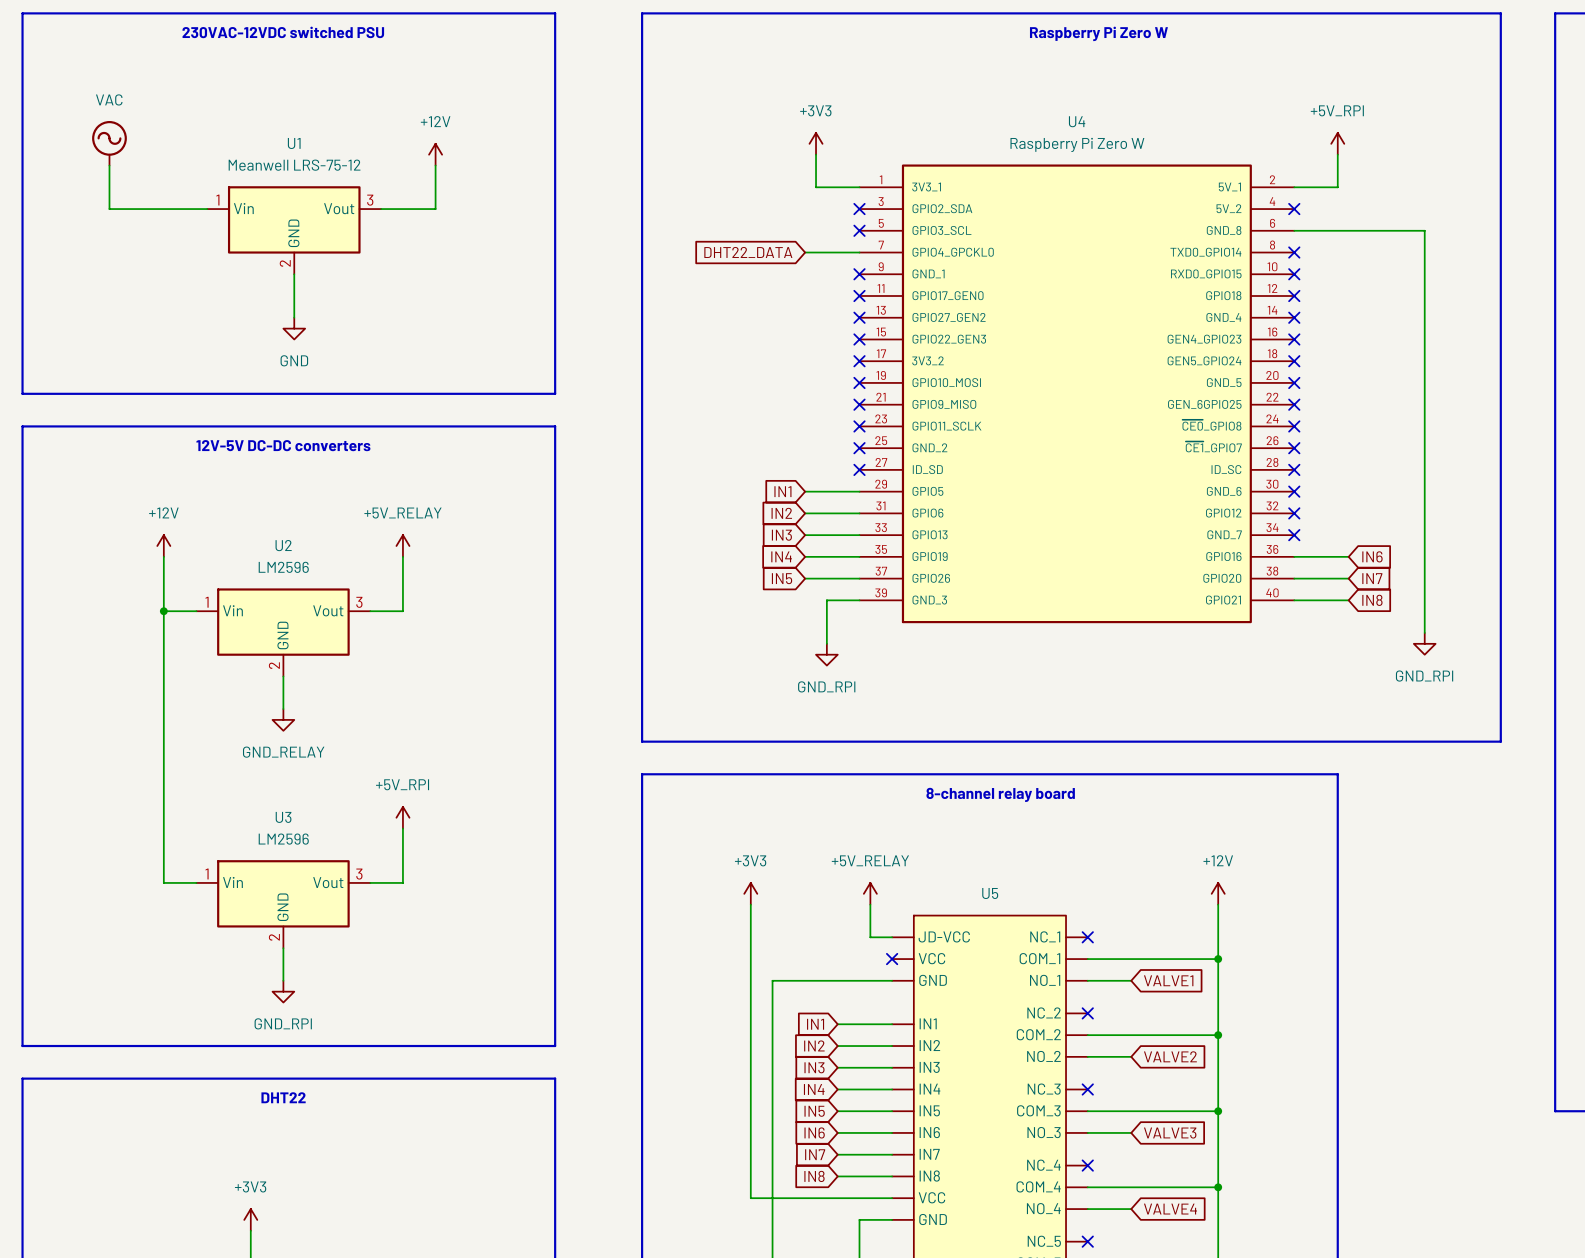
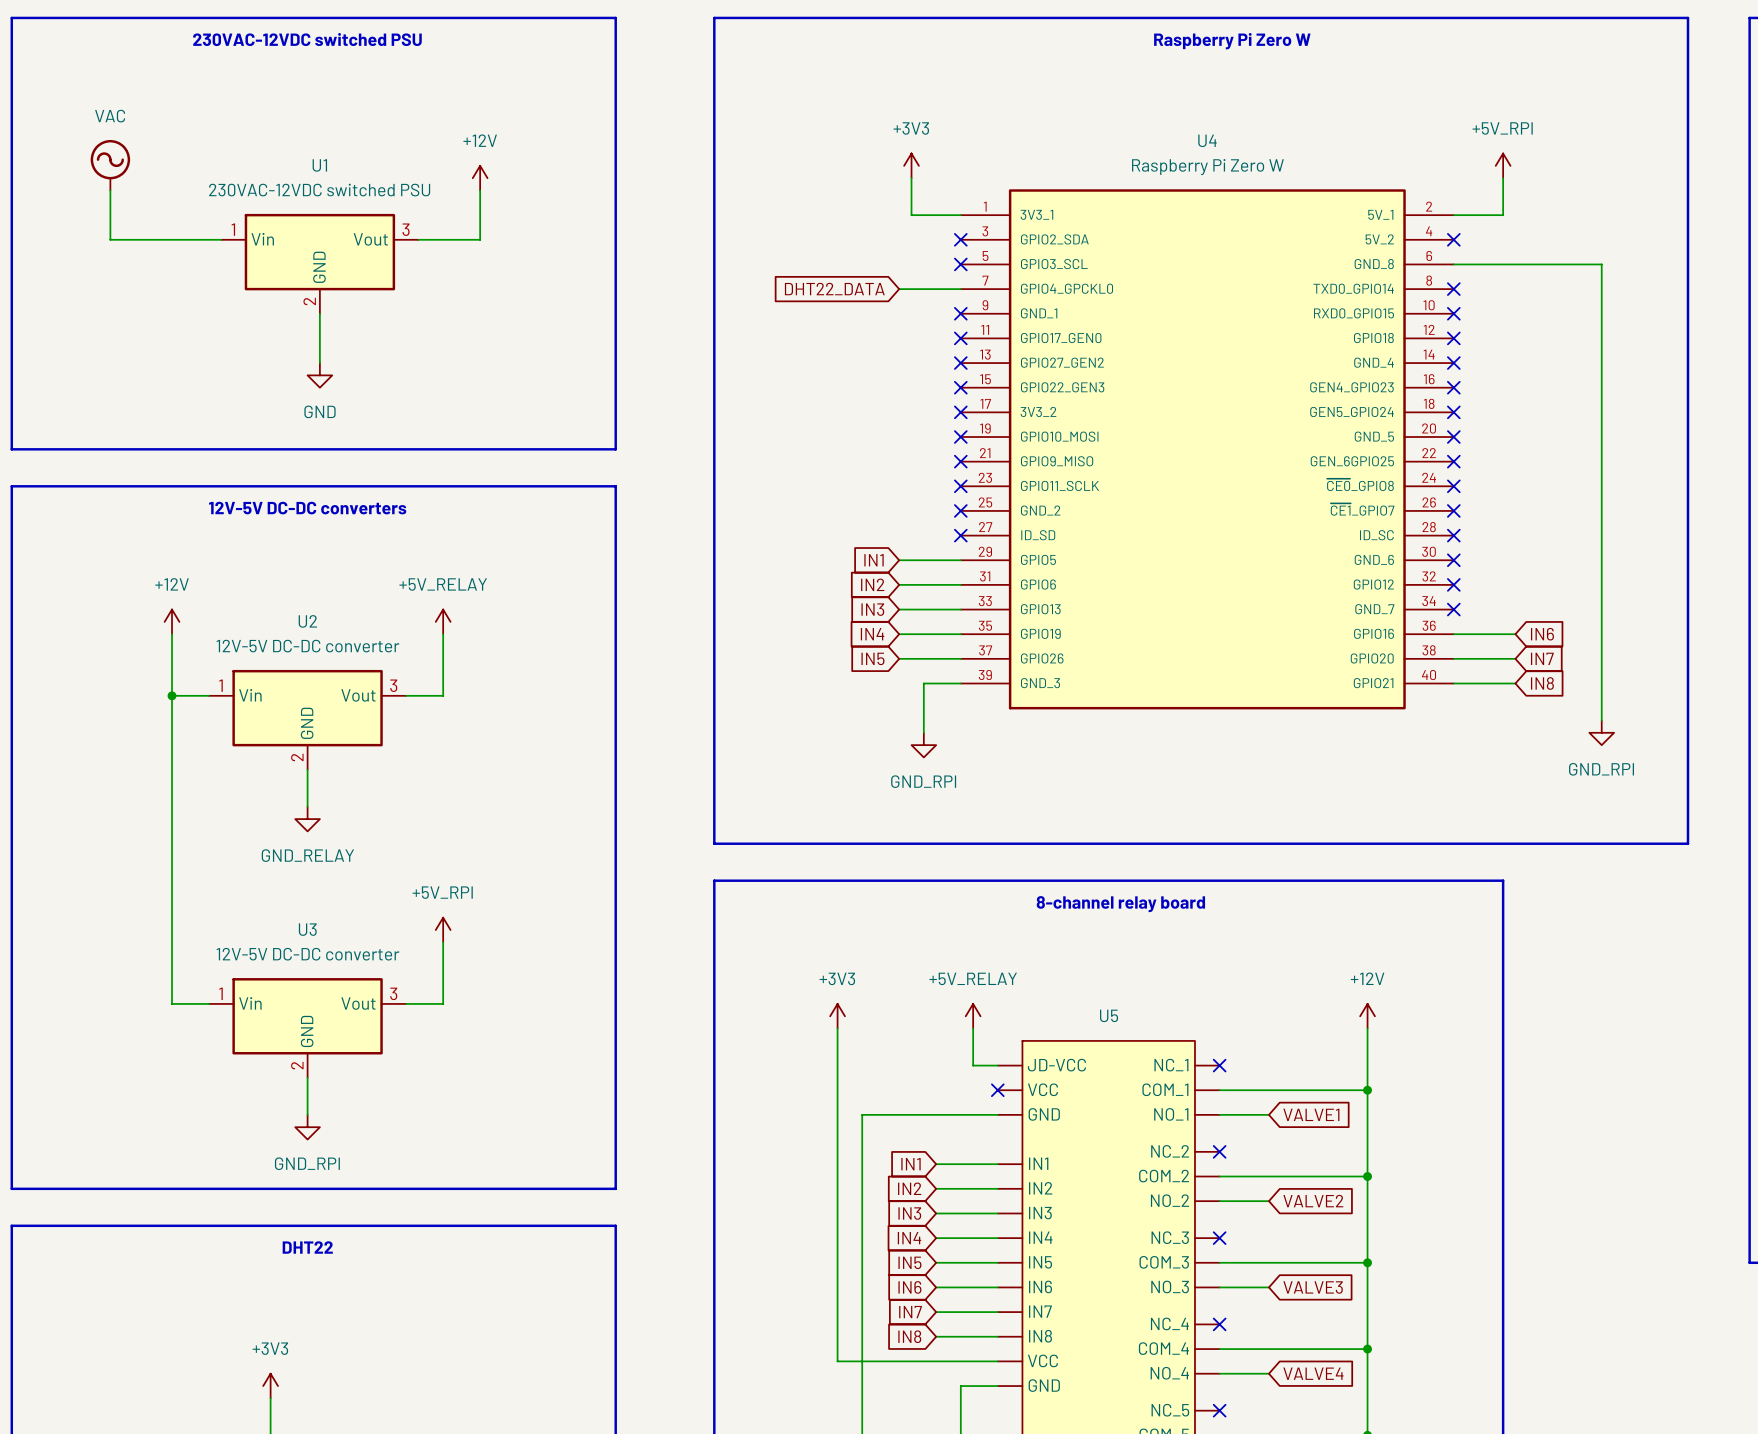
U1 value: Meanwell LRS-75-12 (294, 165) -> 230VAC-12VDC switched PSU (319, 190)
U2 value: LM2596 (283, 567) -> 12V-5V DC-DC converter (307, 646)
U3 value: LM2596 (283, 839) -> 12V-5V DC-DC converter (307, 954)

